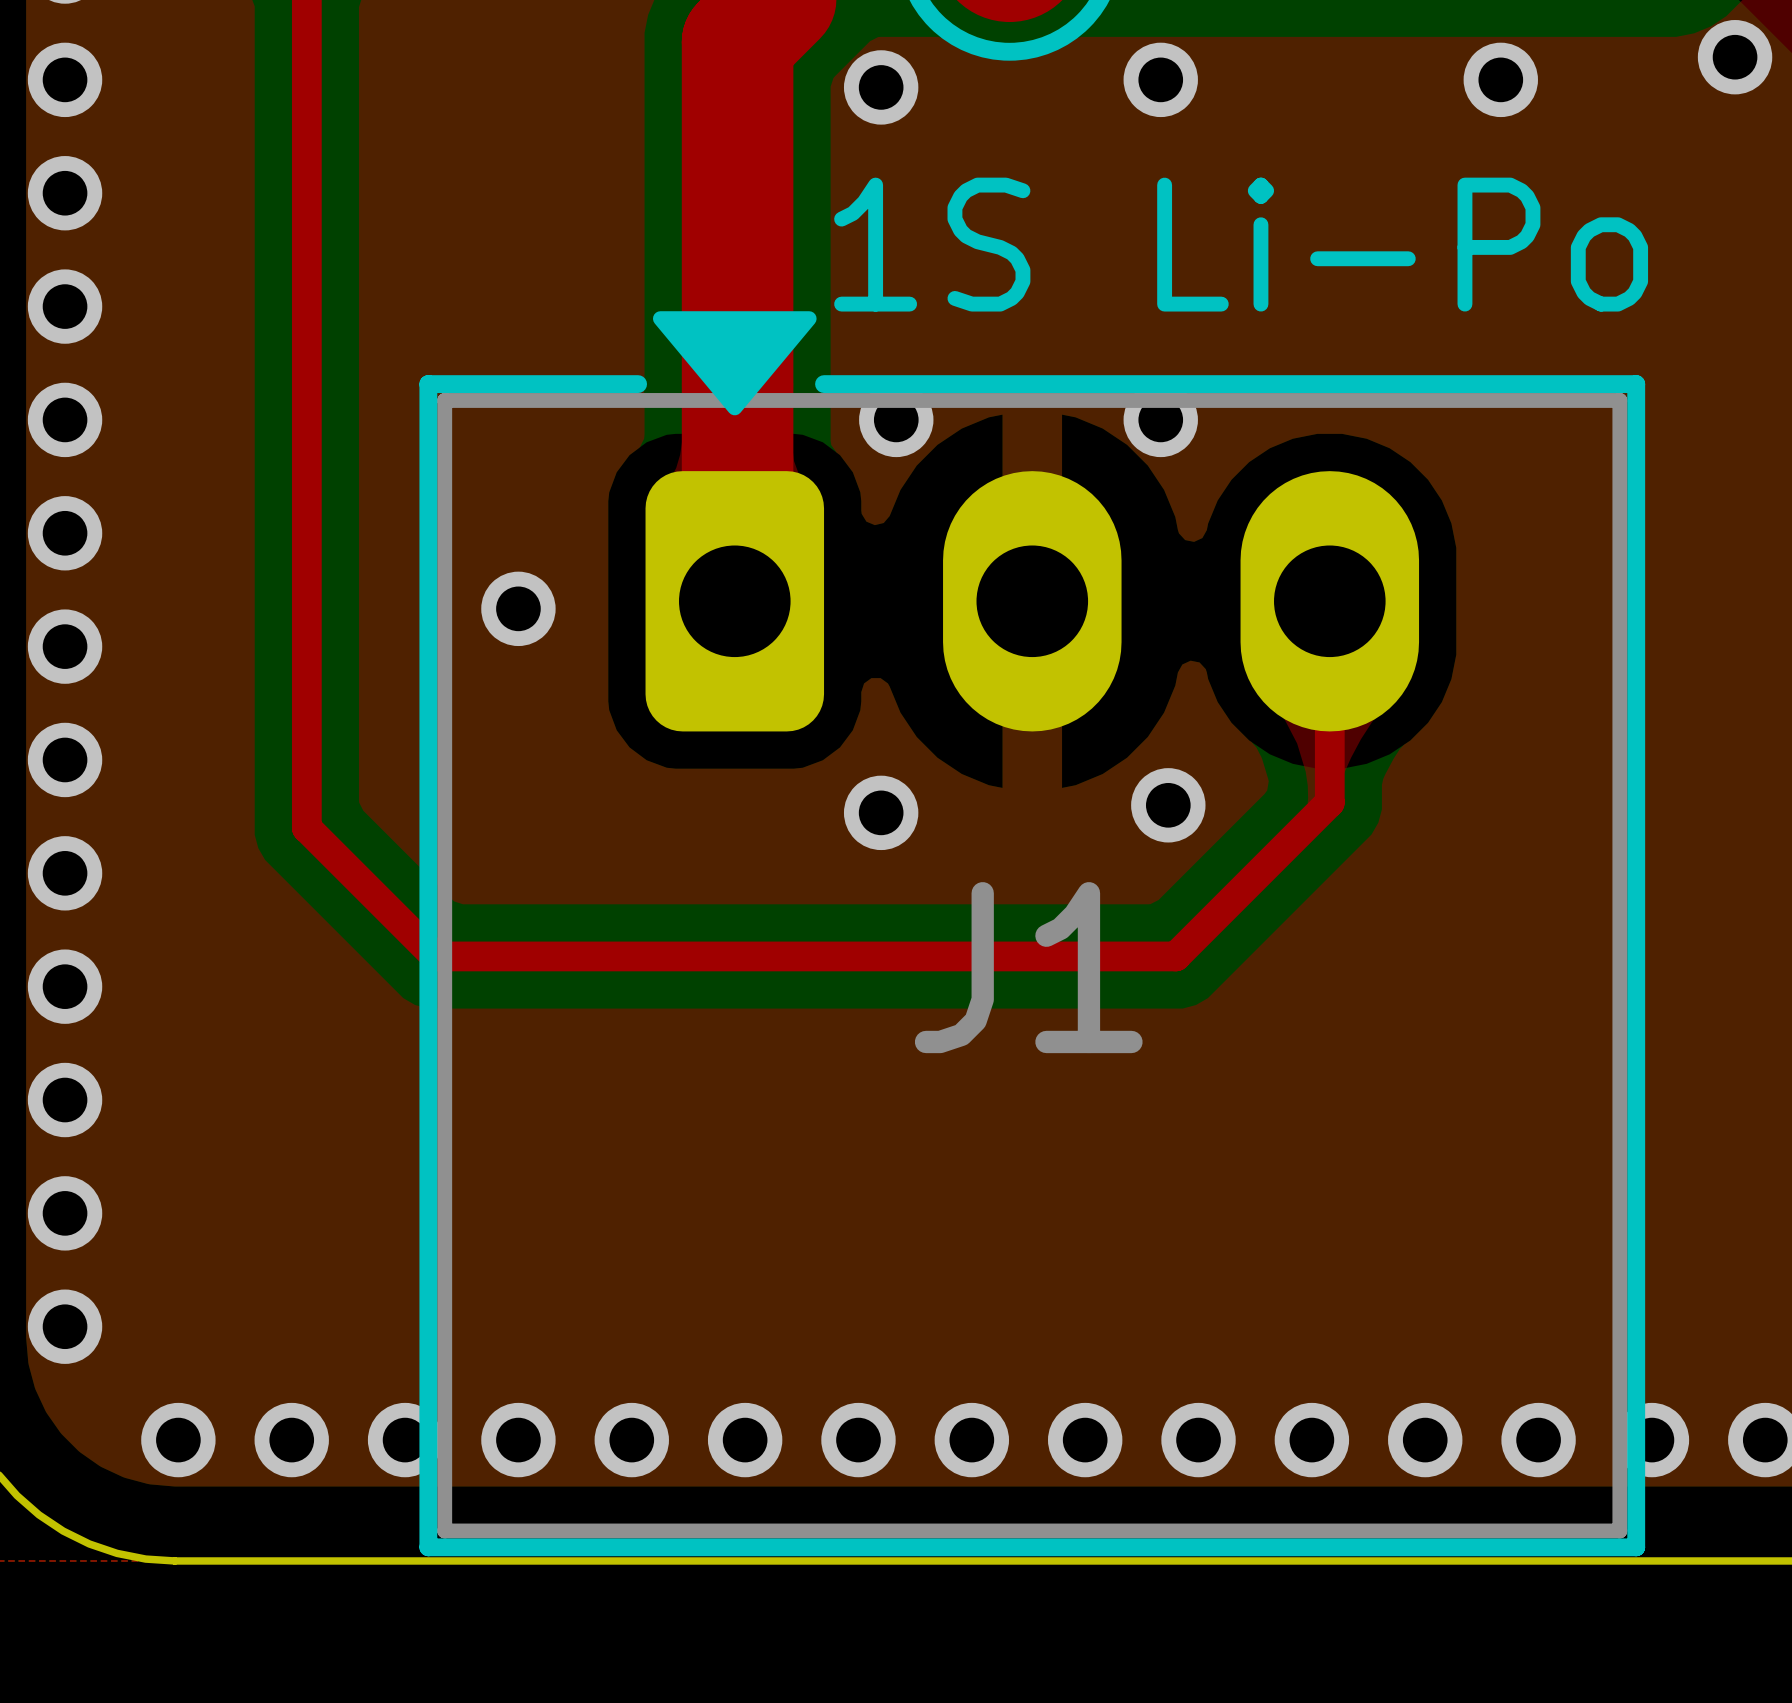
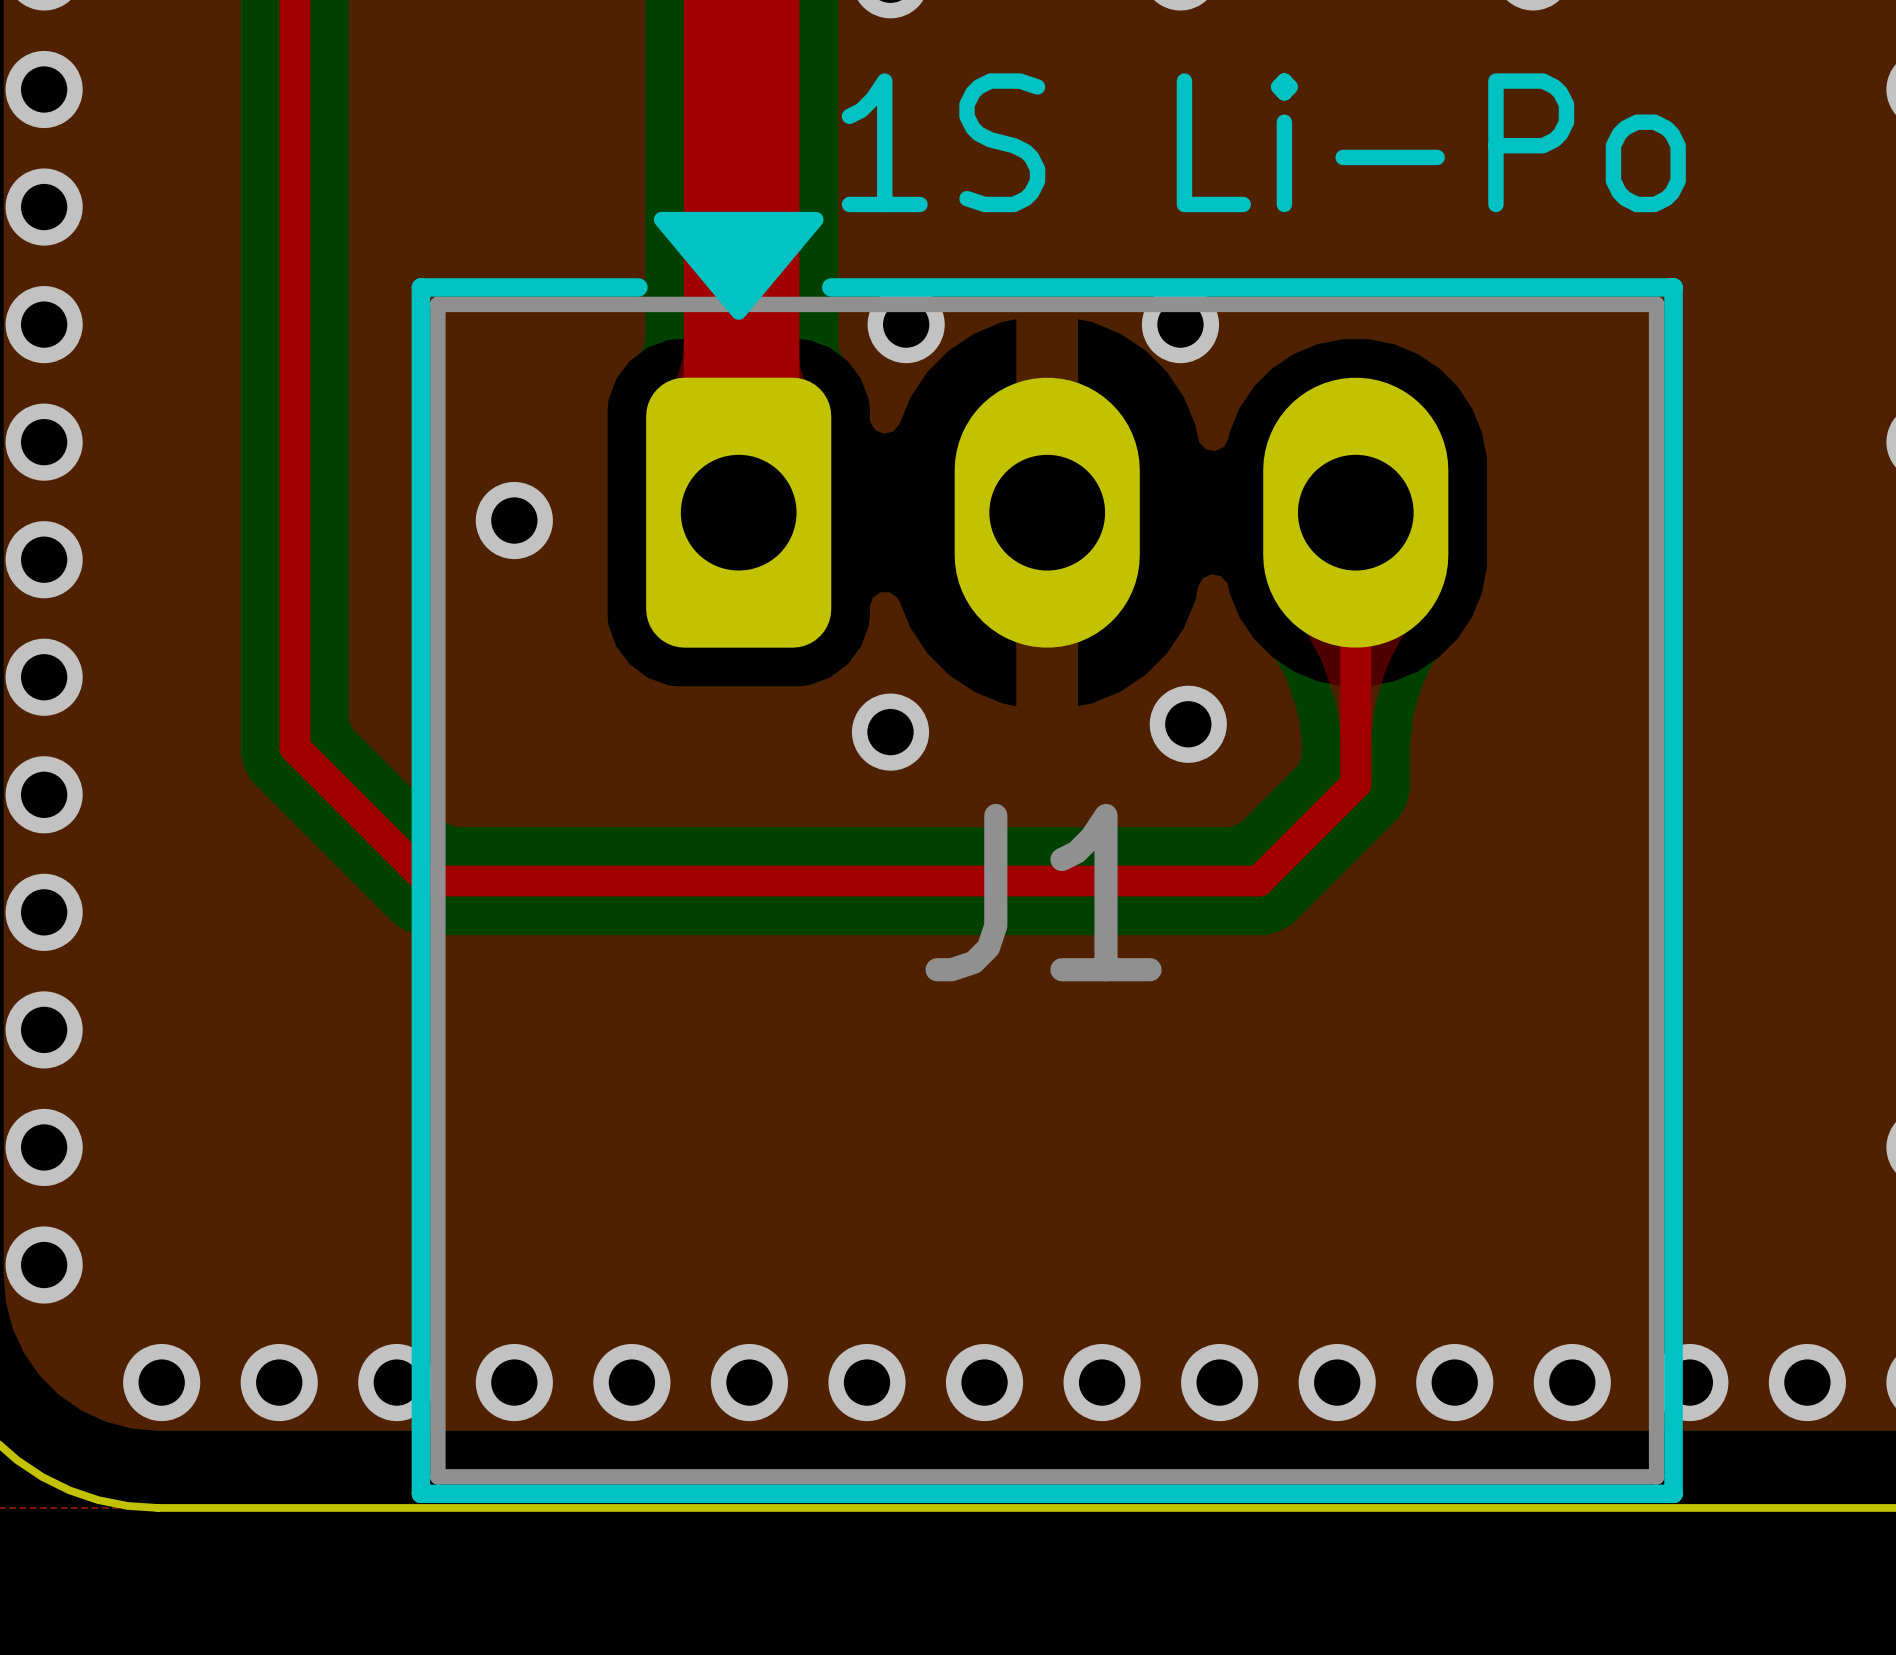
top track: (1329, 802) (1175, 956) -> (1355, 721) (1355, 784) (1258, 881) (1196, 881)

